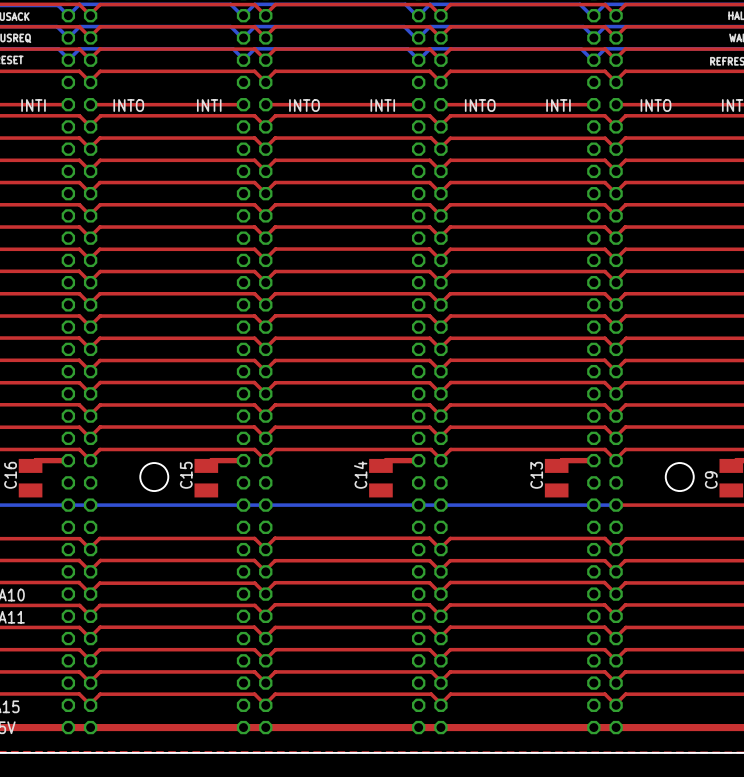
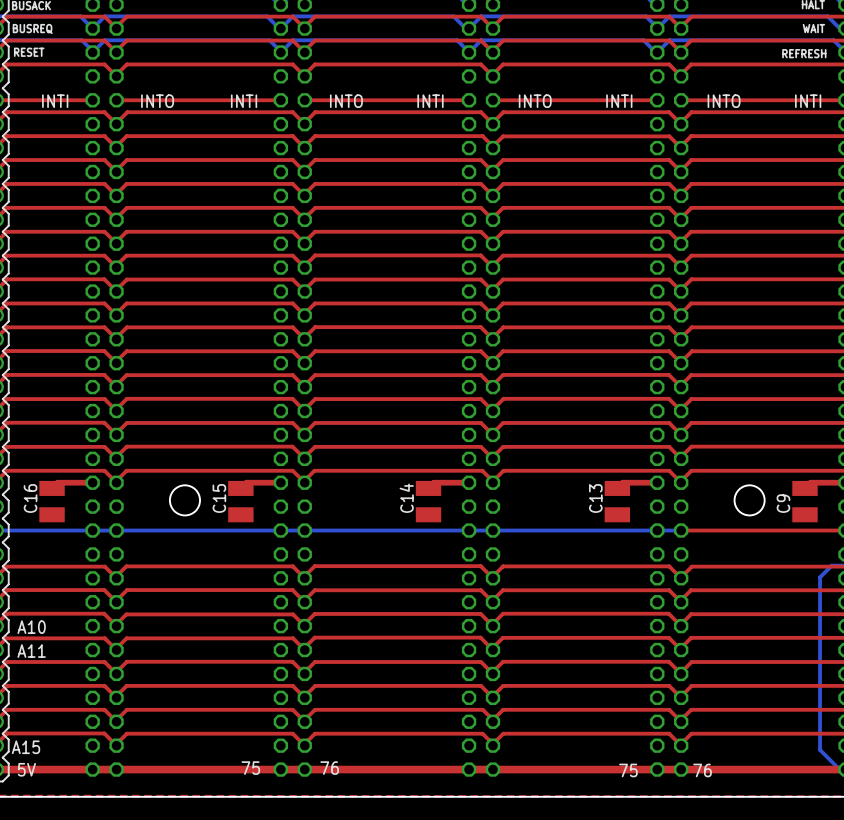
text: none -> 75 (250, 768)
text: none -> 76 (329, 768)
text: none -> 75 (628, 770)
text: none -> 76 (702, 770)

